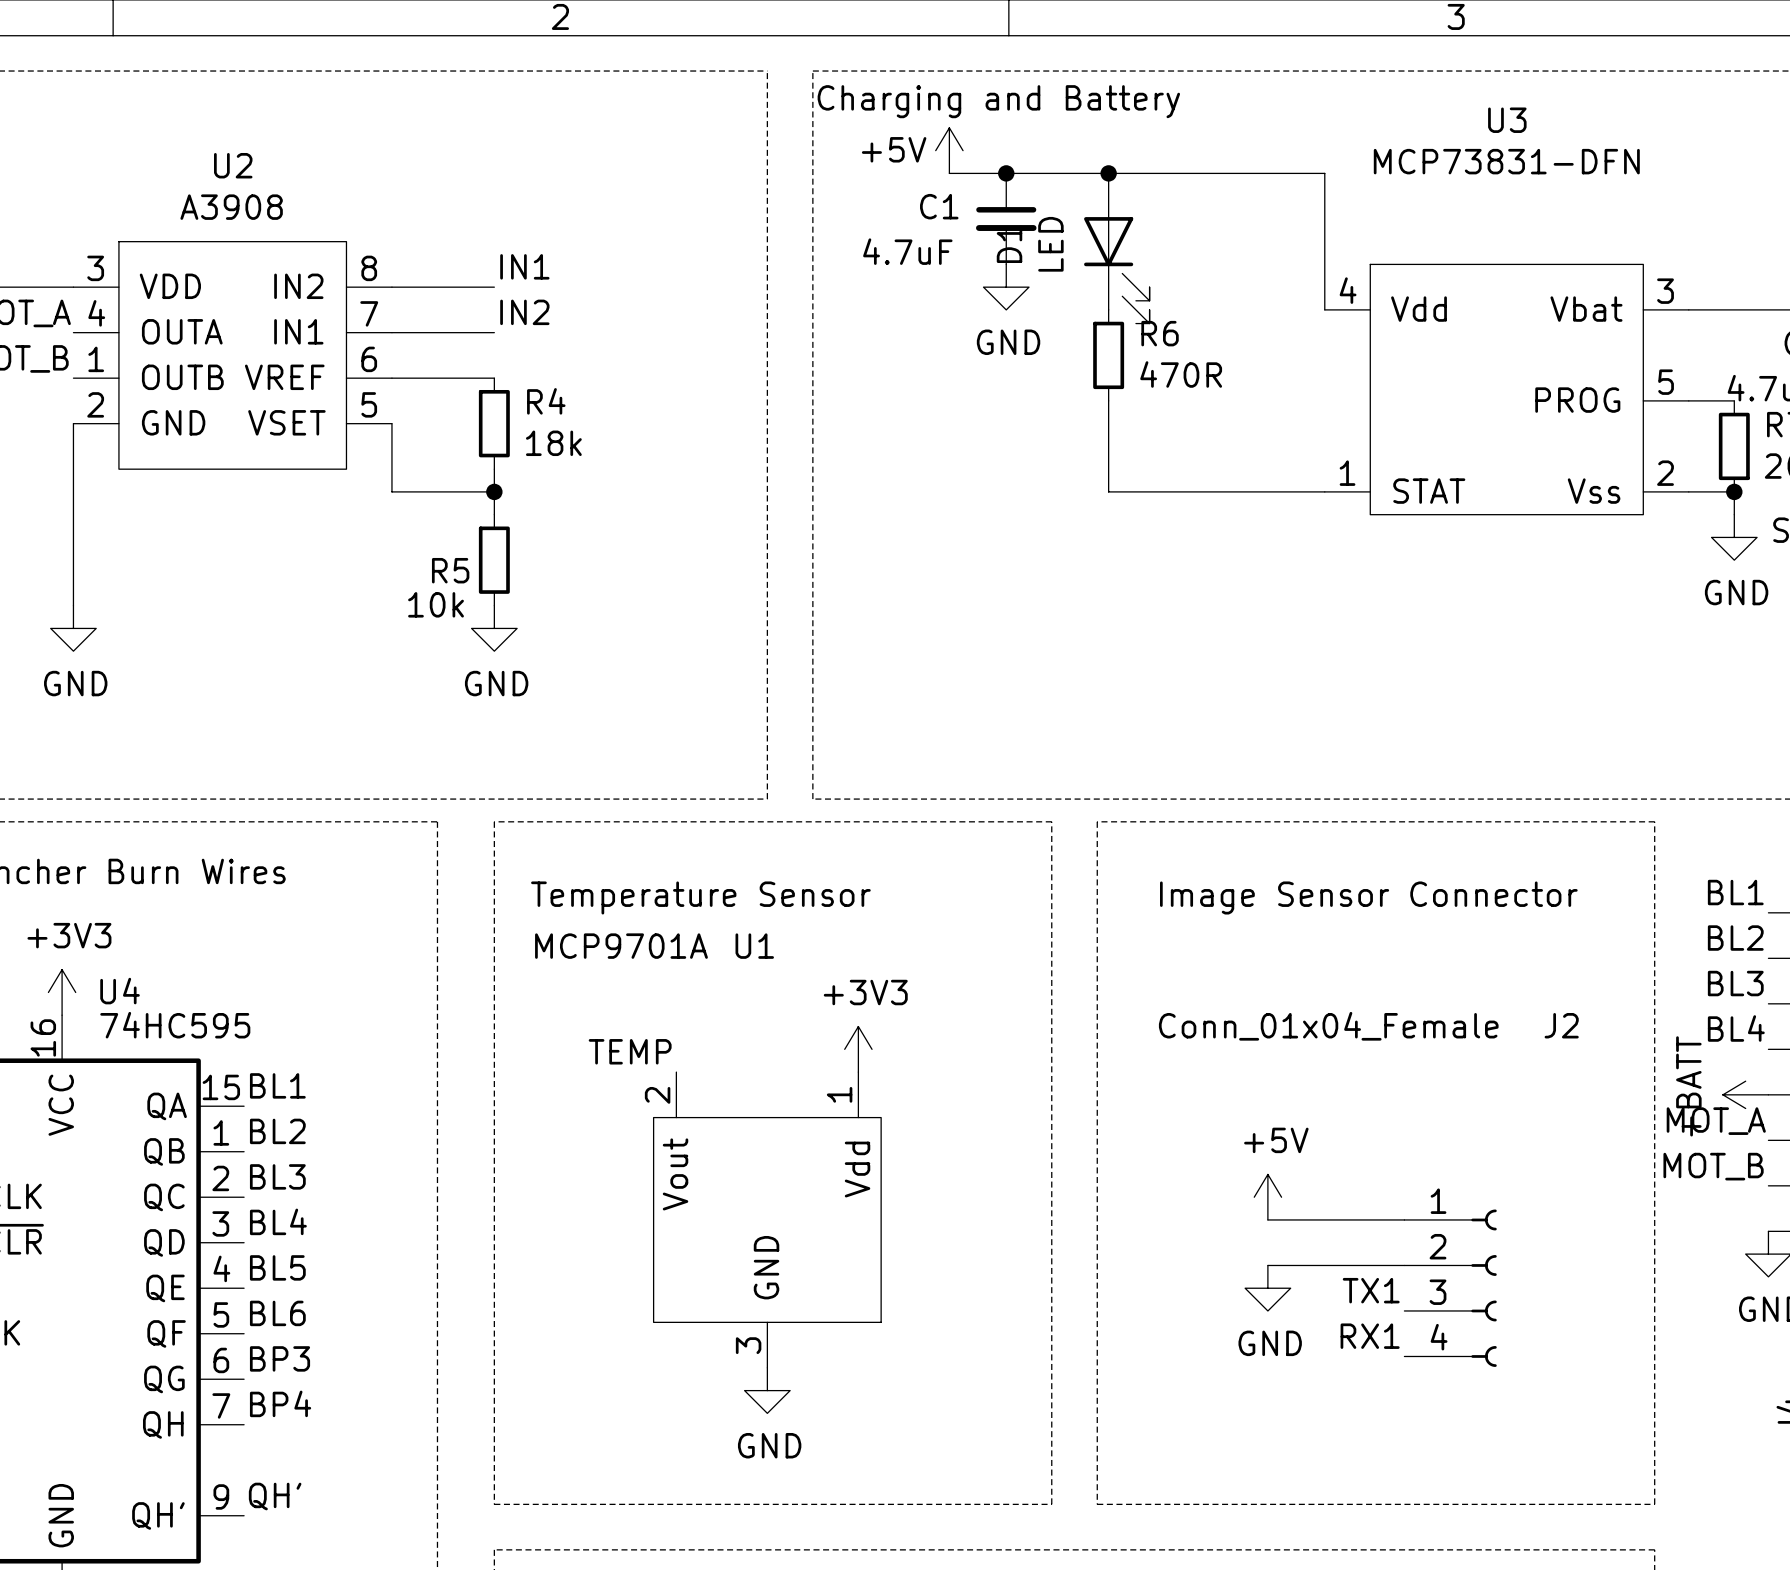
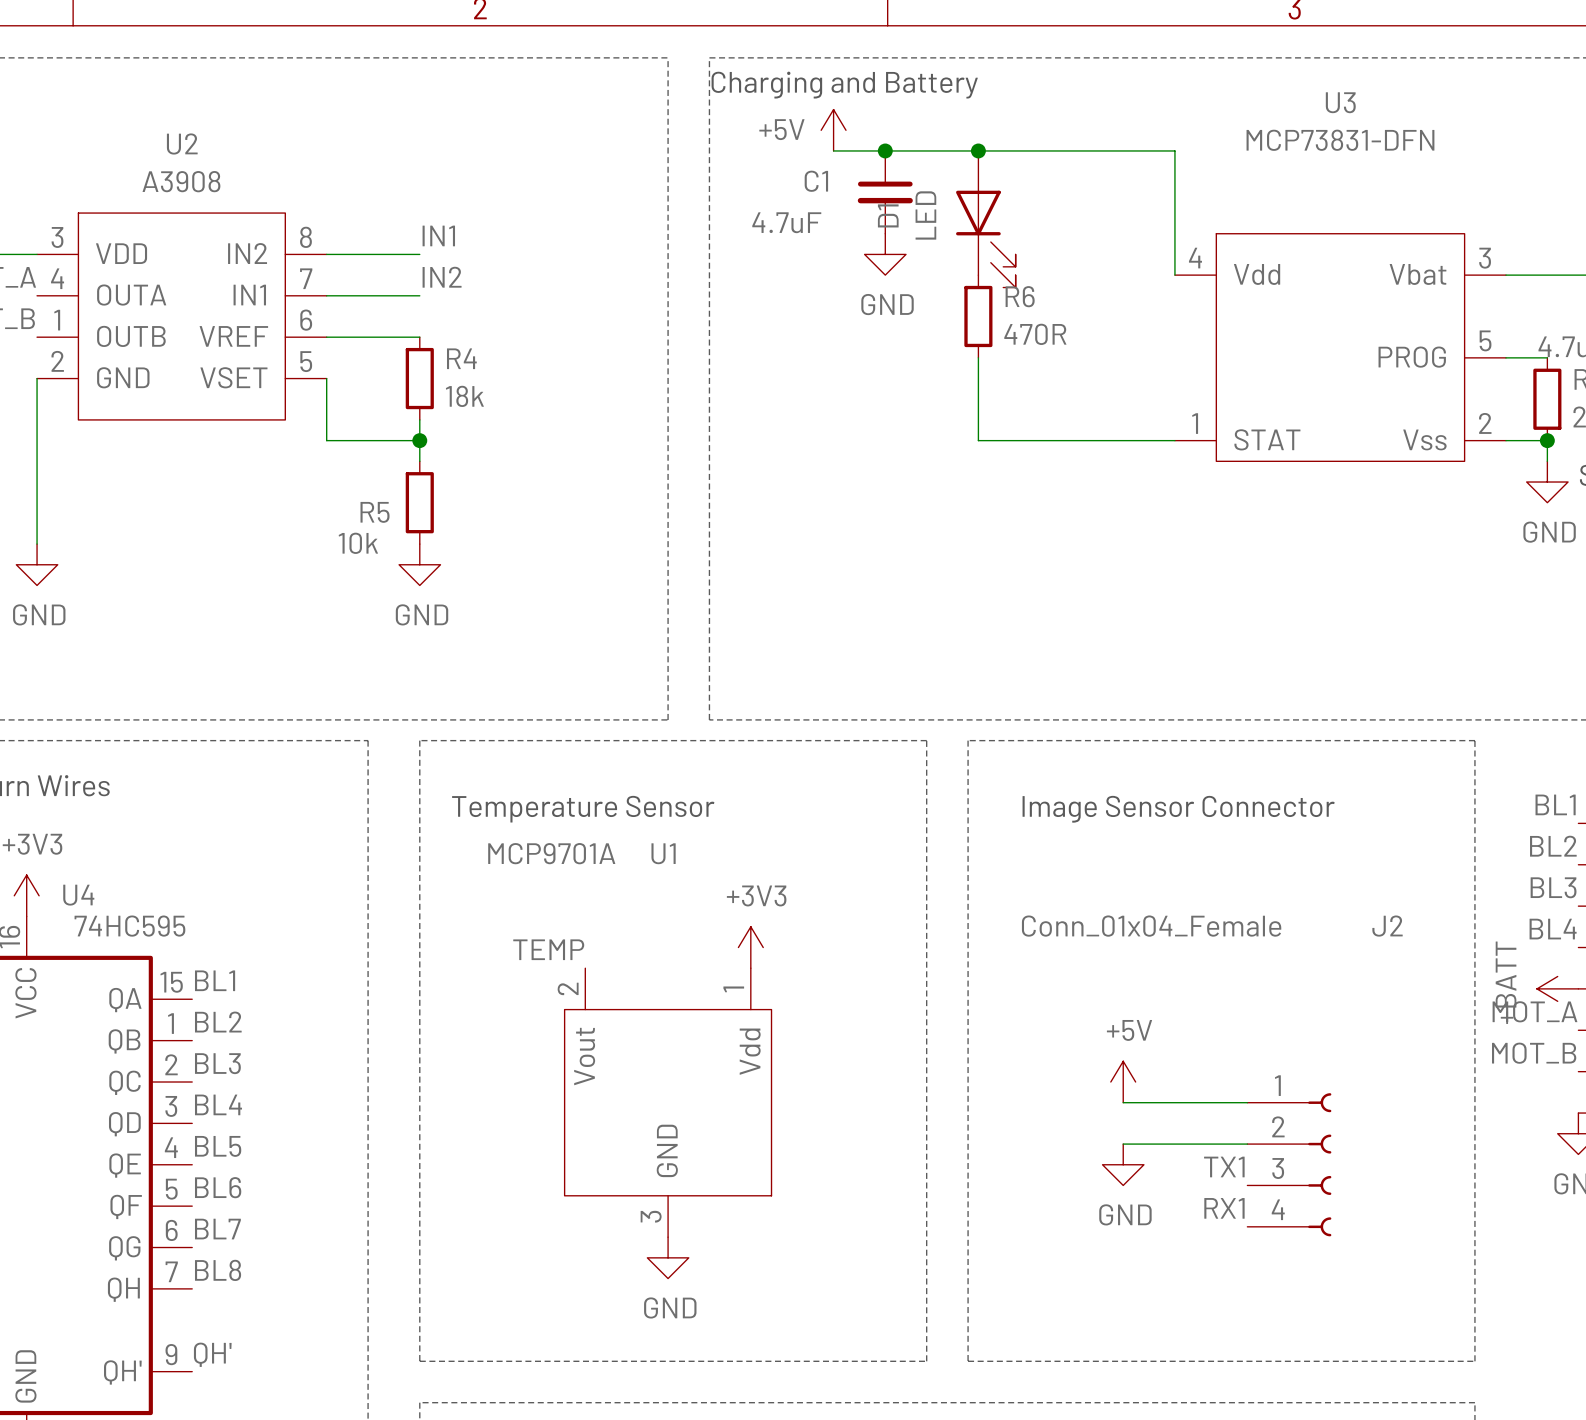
label: BP3 (280, 1358) -> BL7 (217, 1229)
label: BP4 (280, 1403) -> BL8 (218, 1270)

